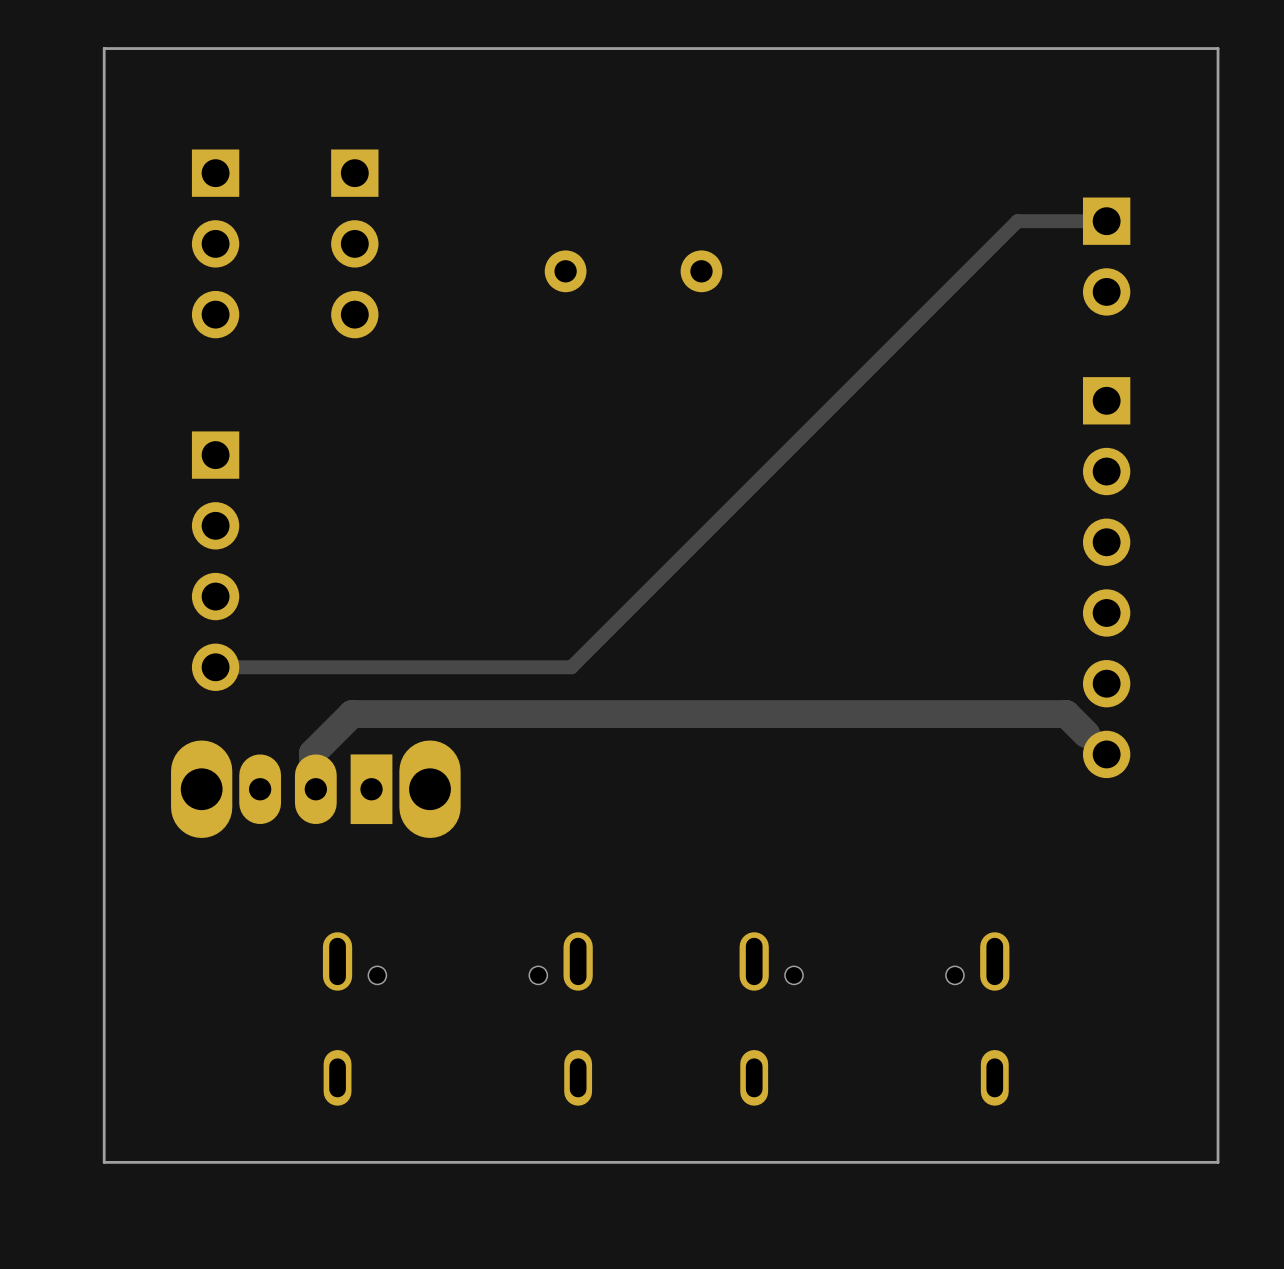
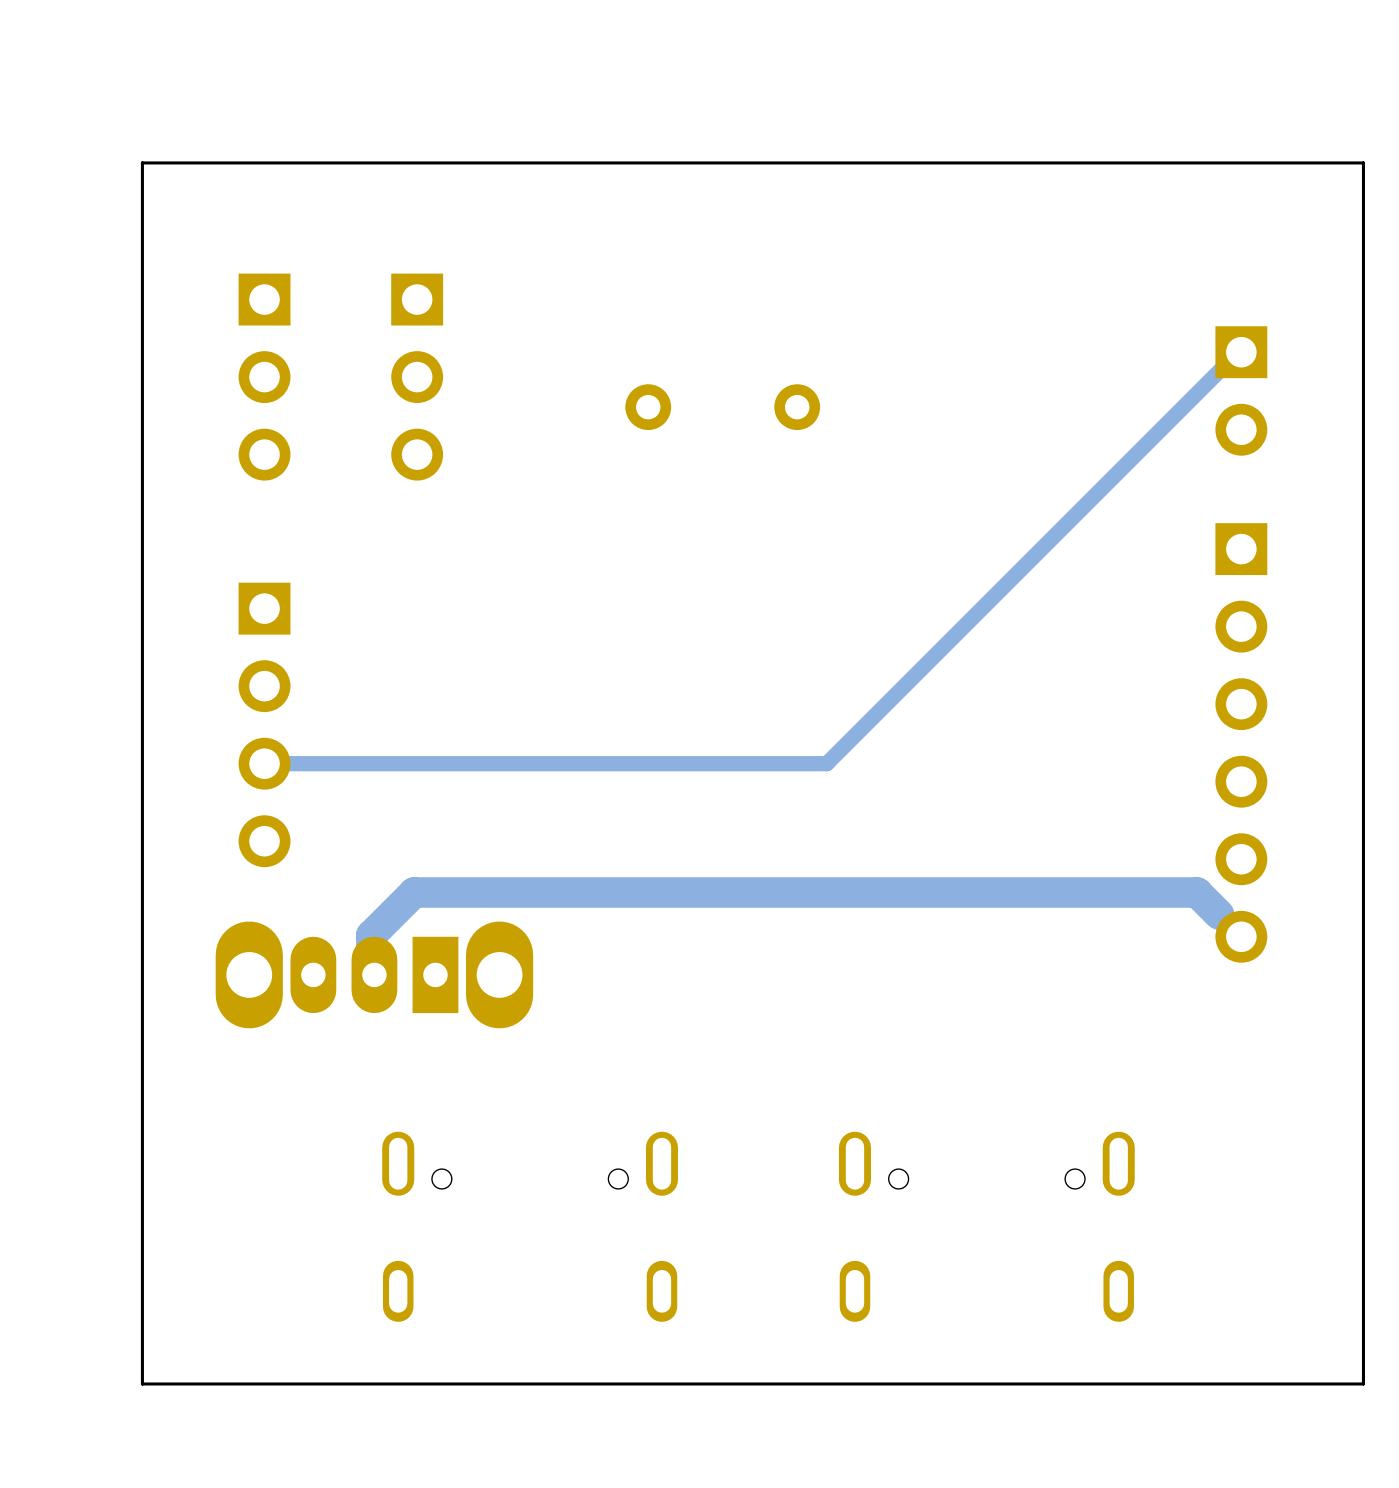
track: (1103, 221) (1017, 221) (571, 667) (215, 667) -> (1238, 352) (826, 763) (264, 763)

